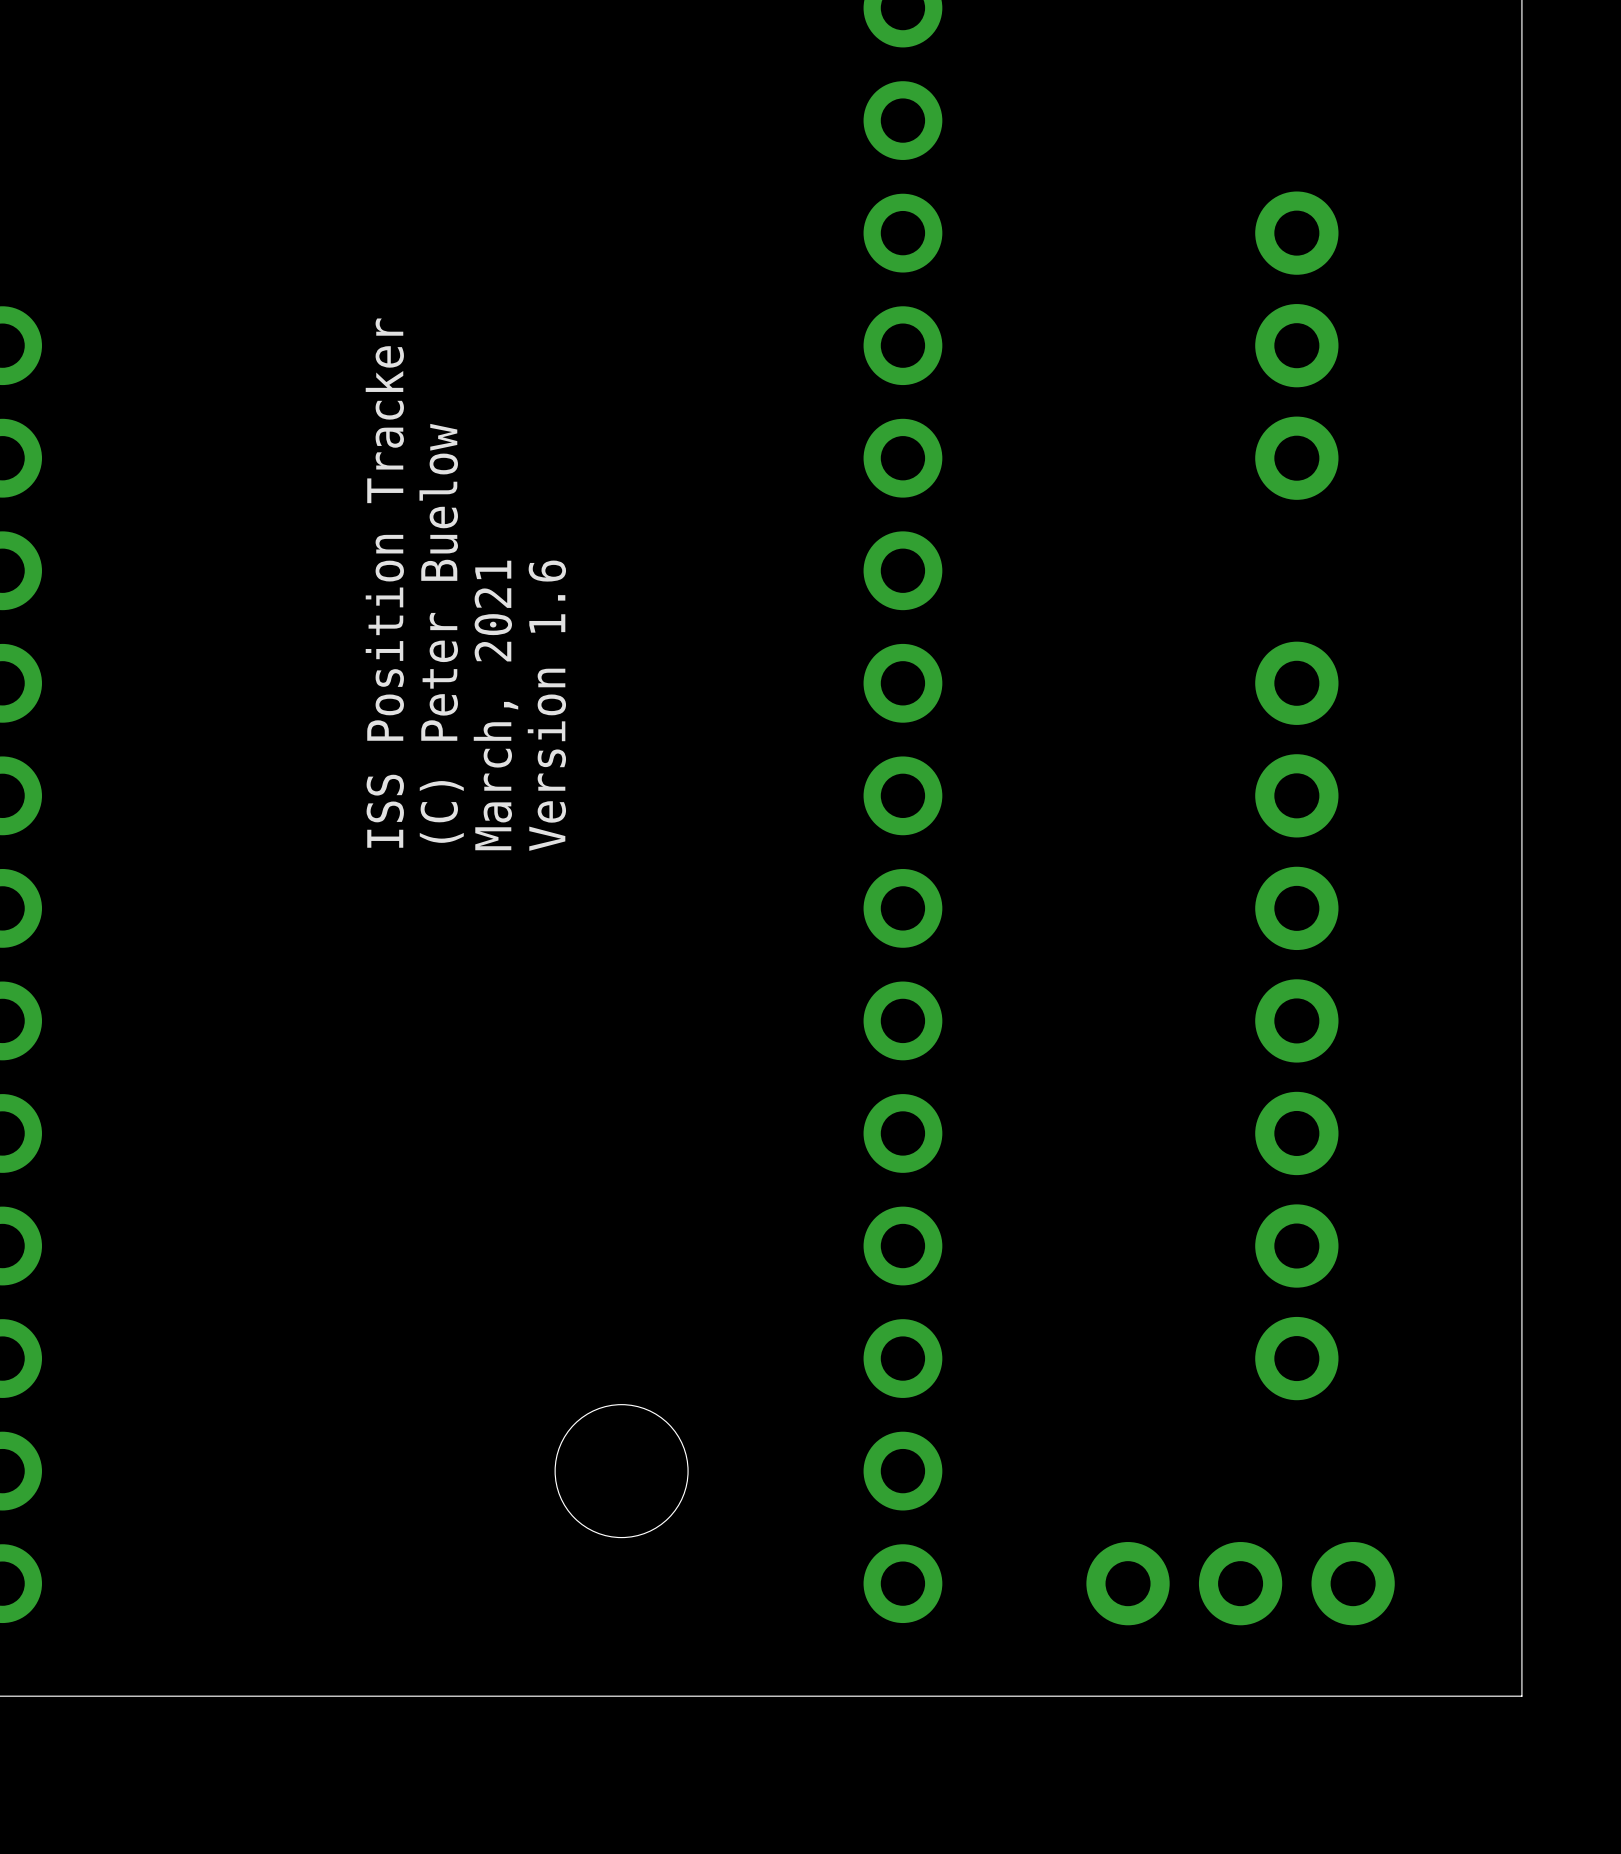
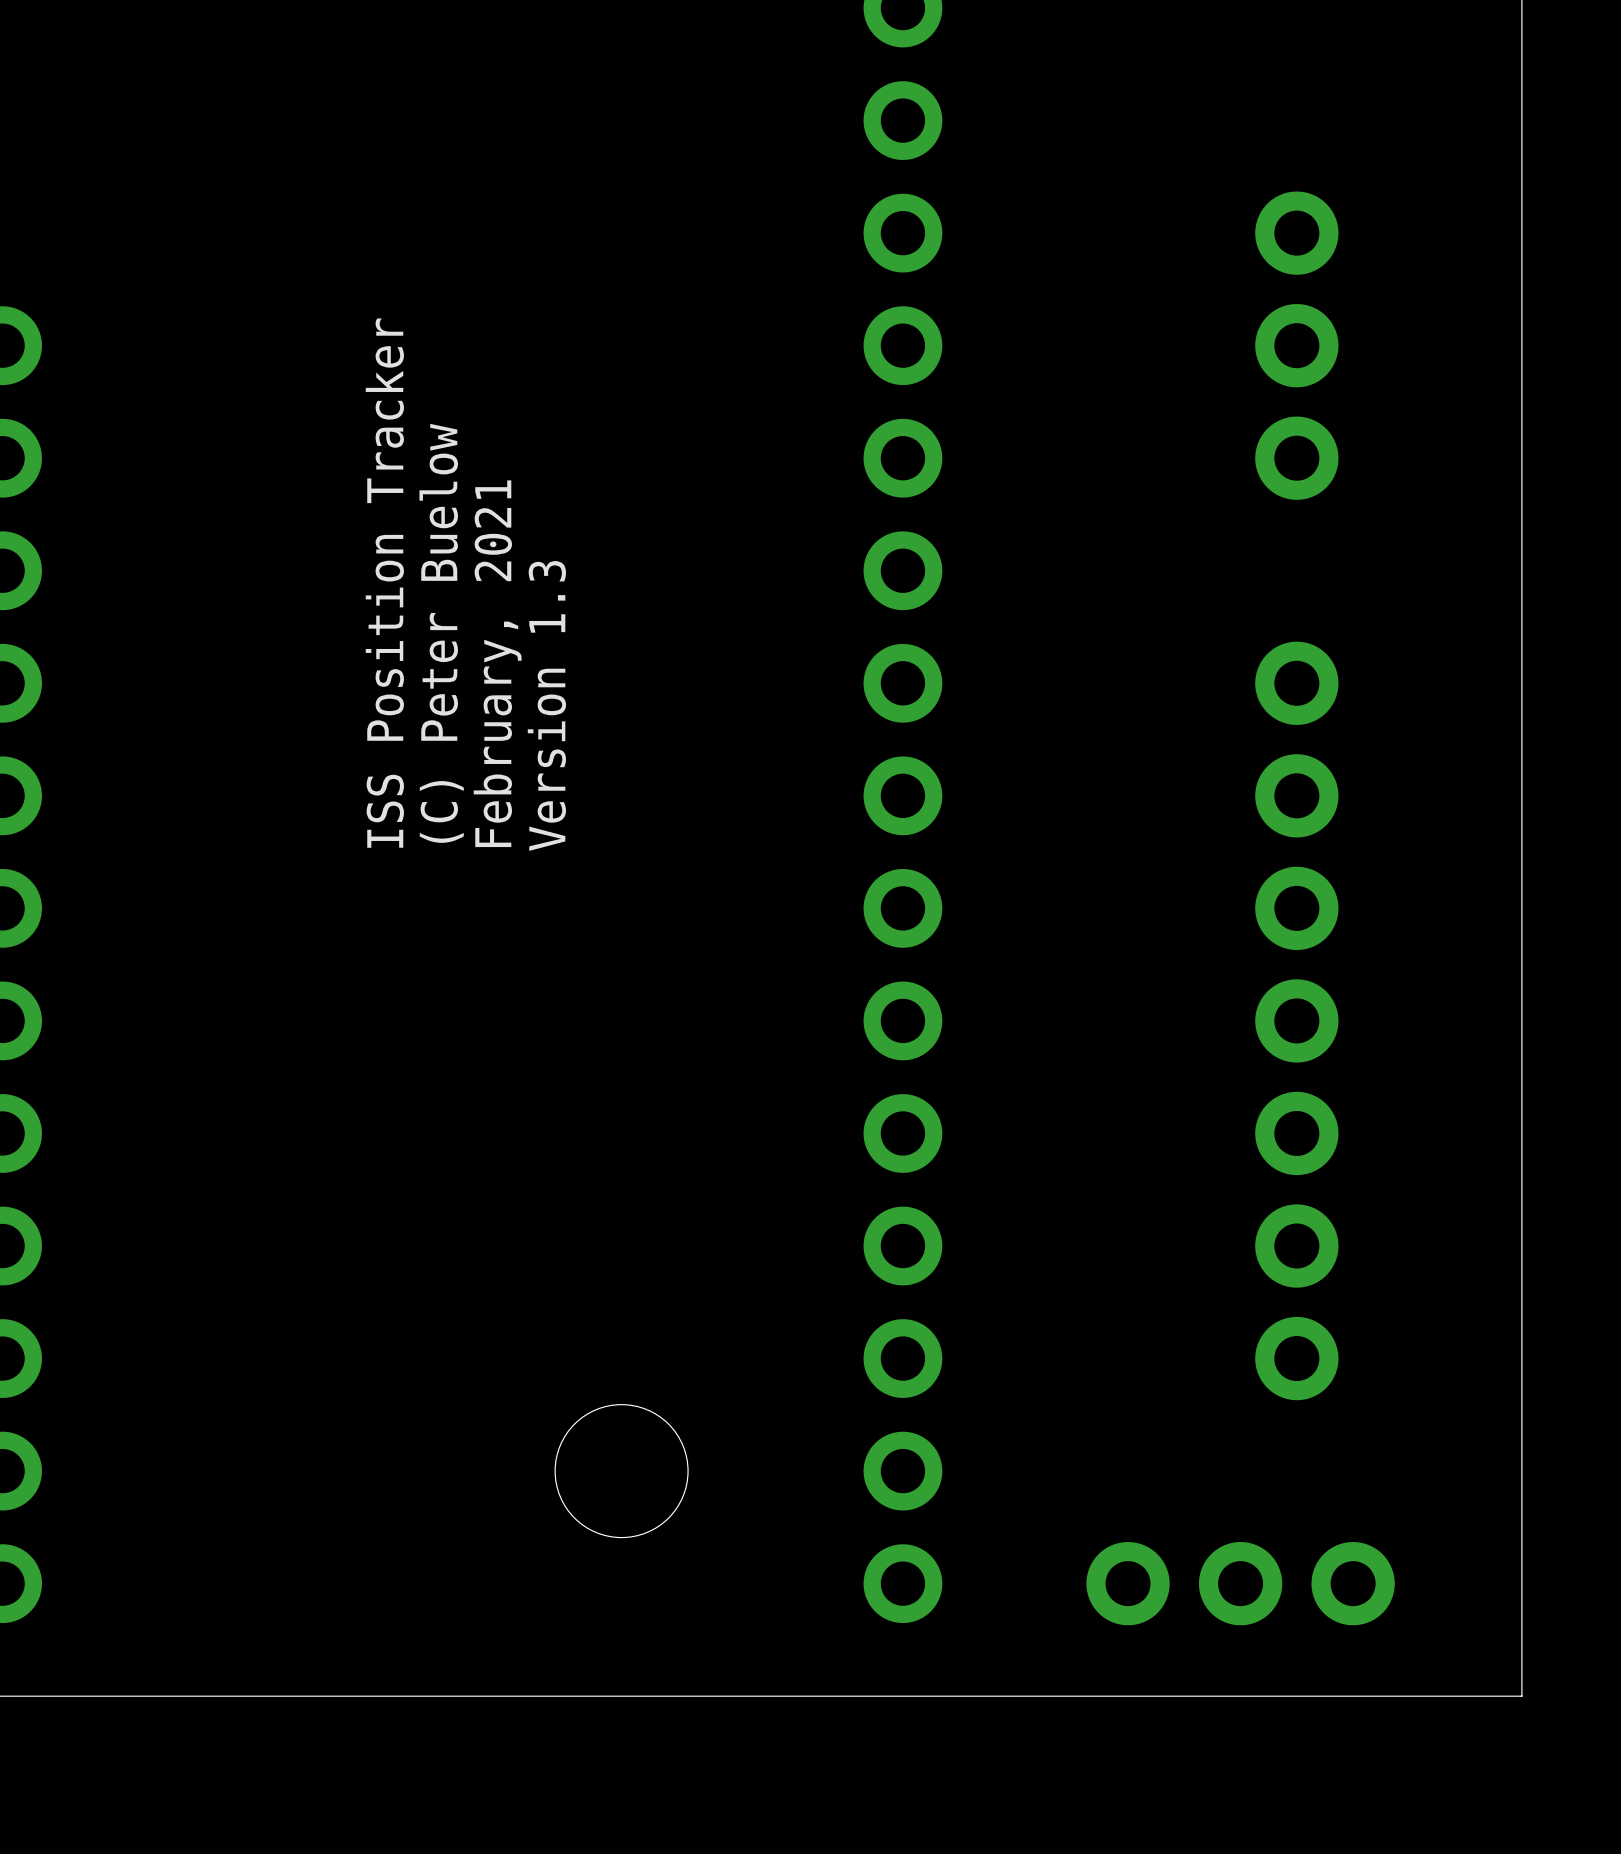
text: March, 2021 (495, 705) -> February, 2021 (497, 663)
text: Version 1.6 (546, 705) -> Version 1.3 (546, 705)

